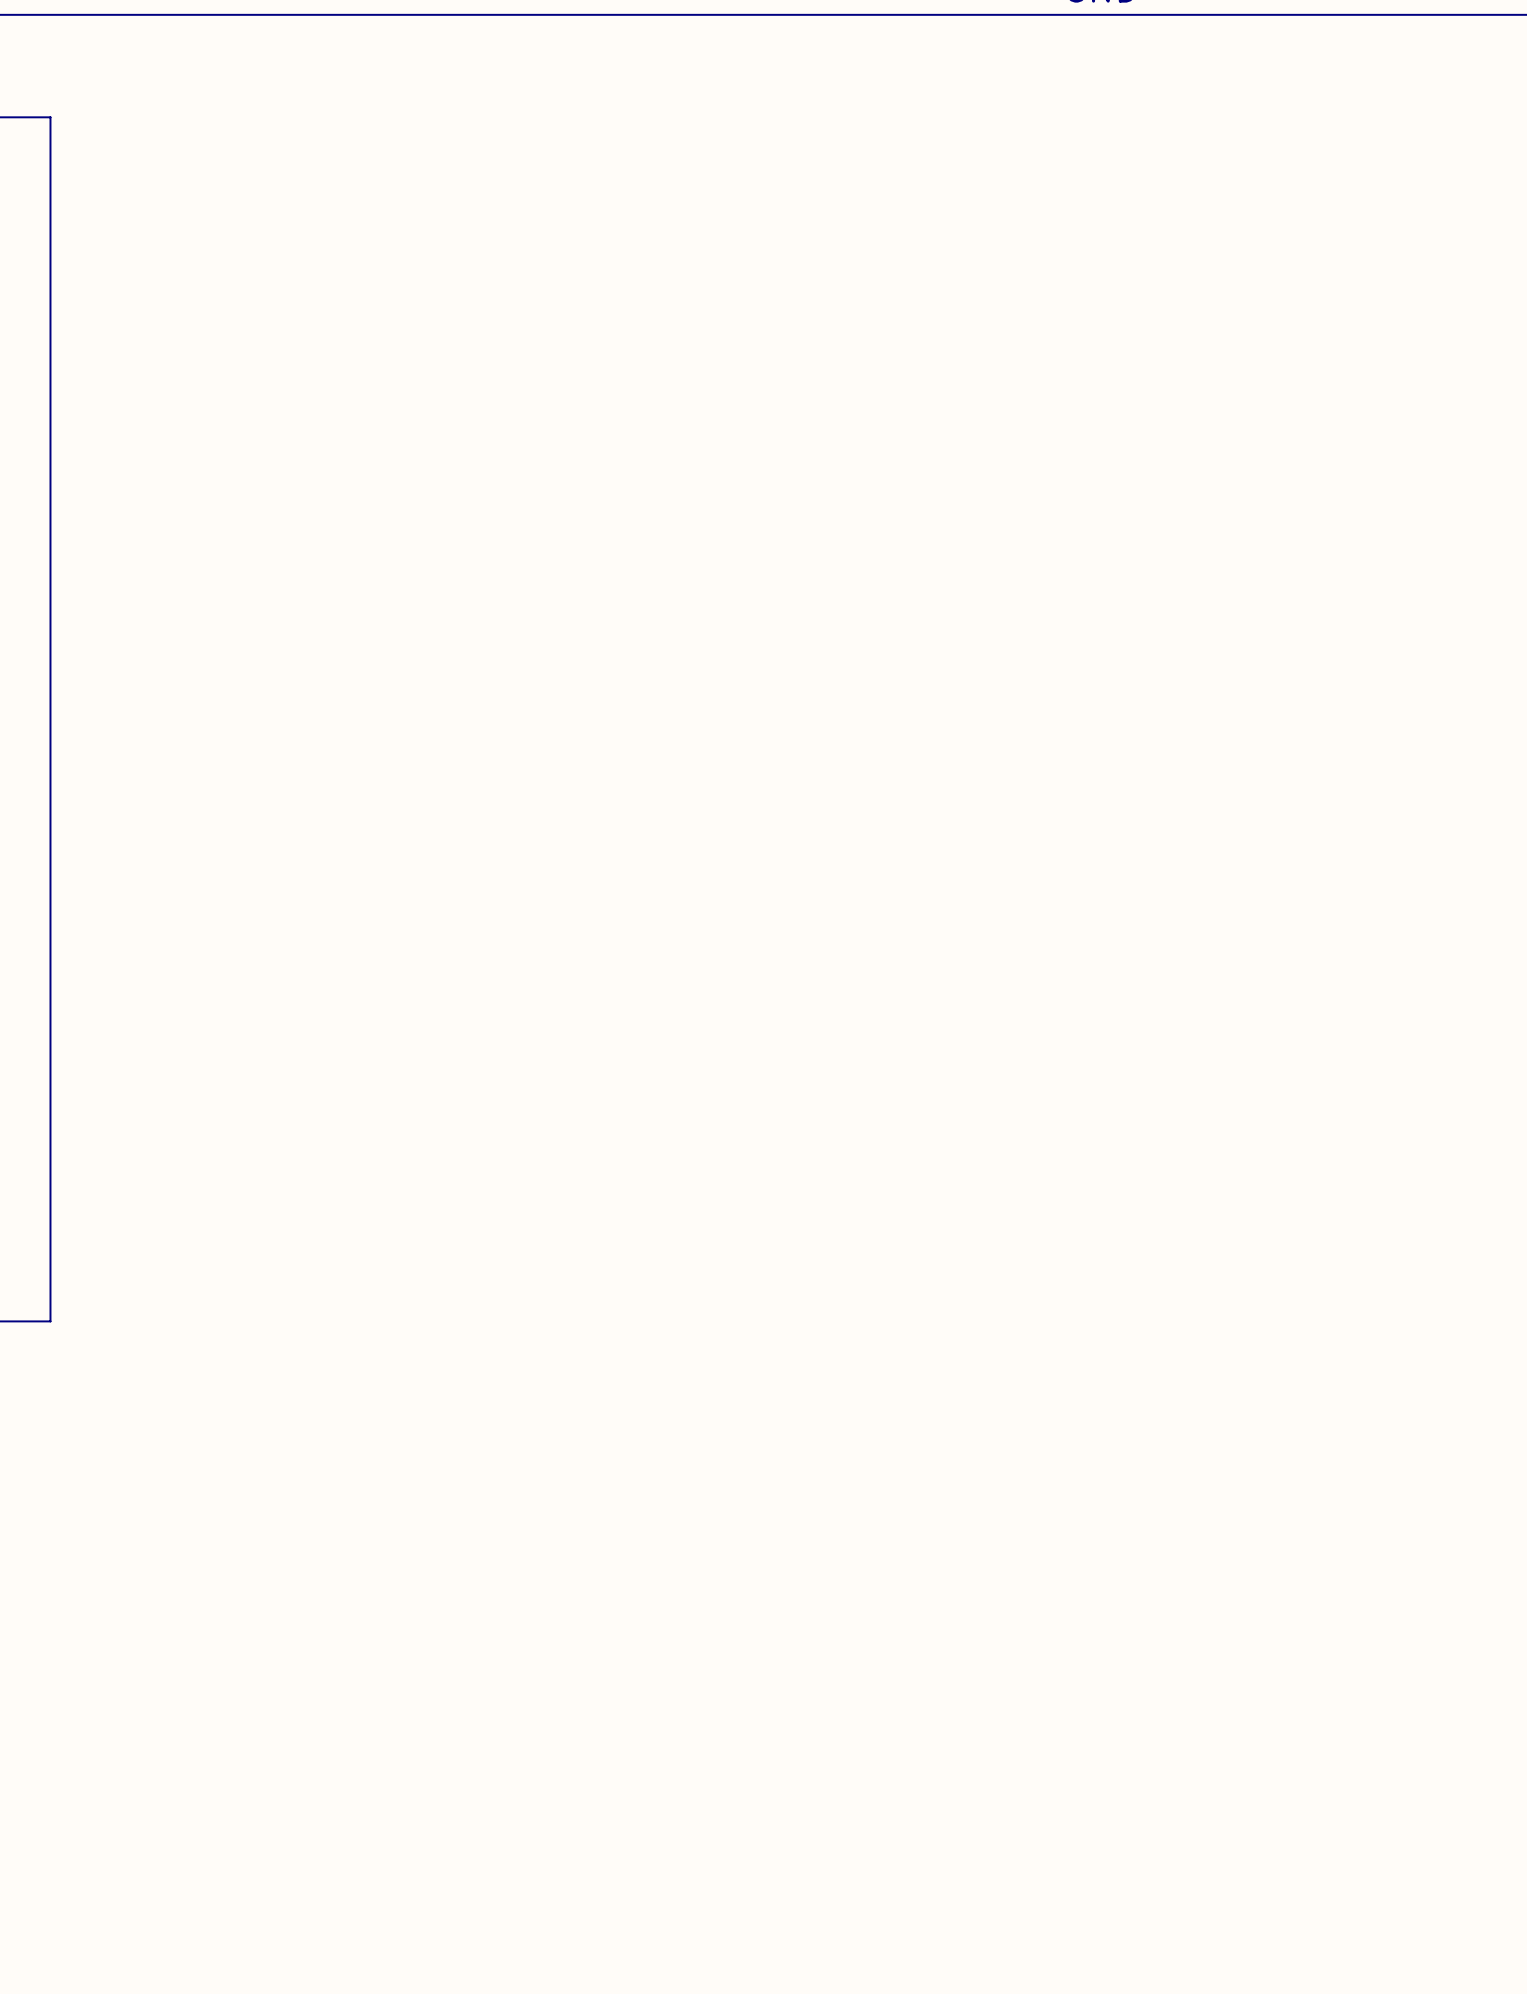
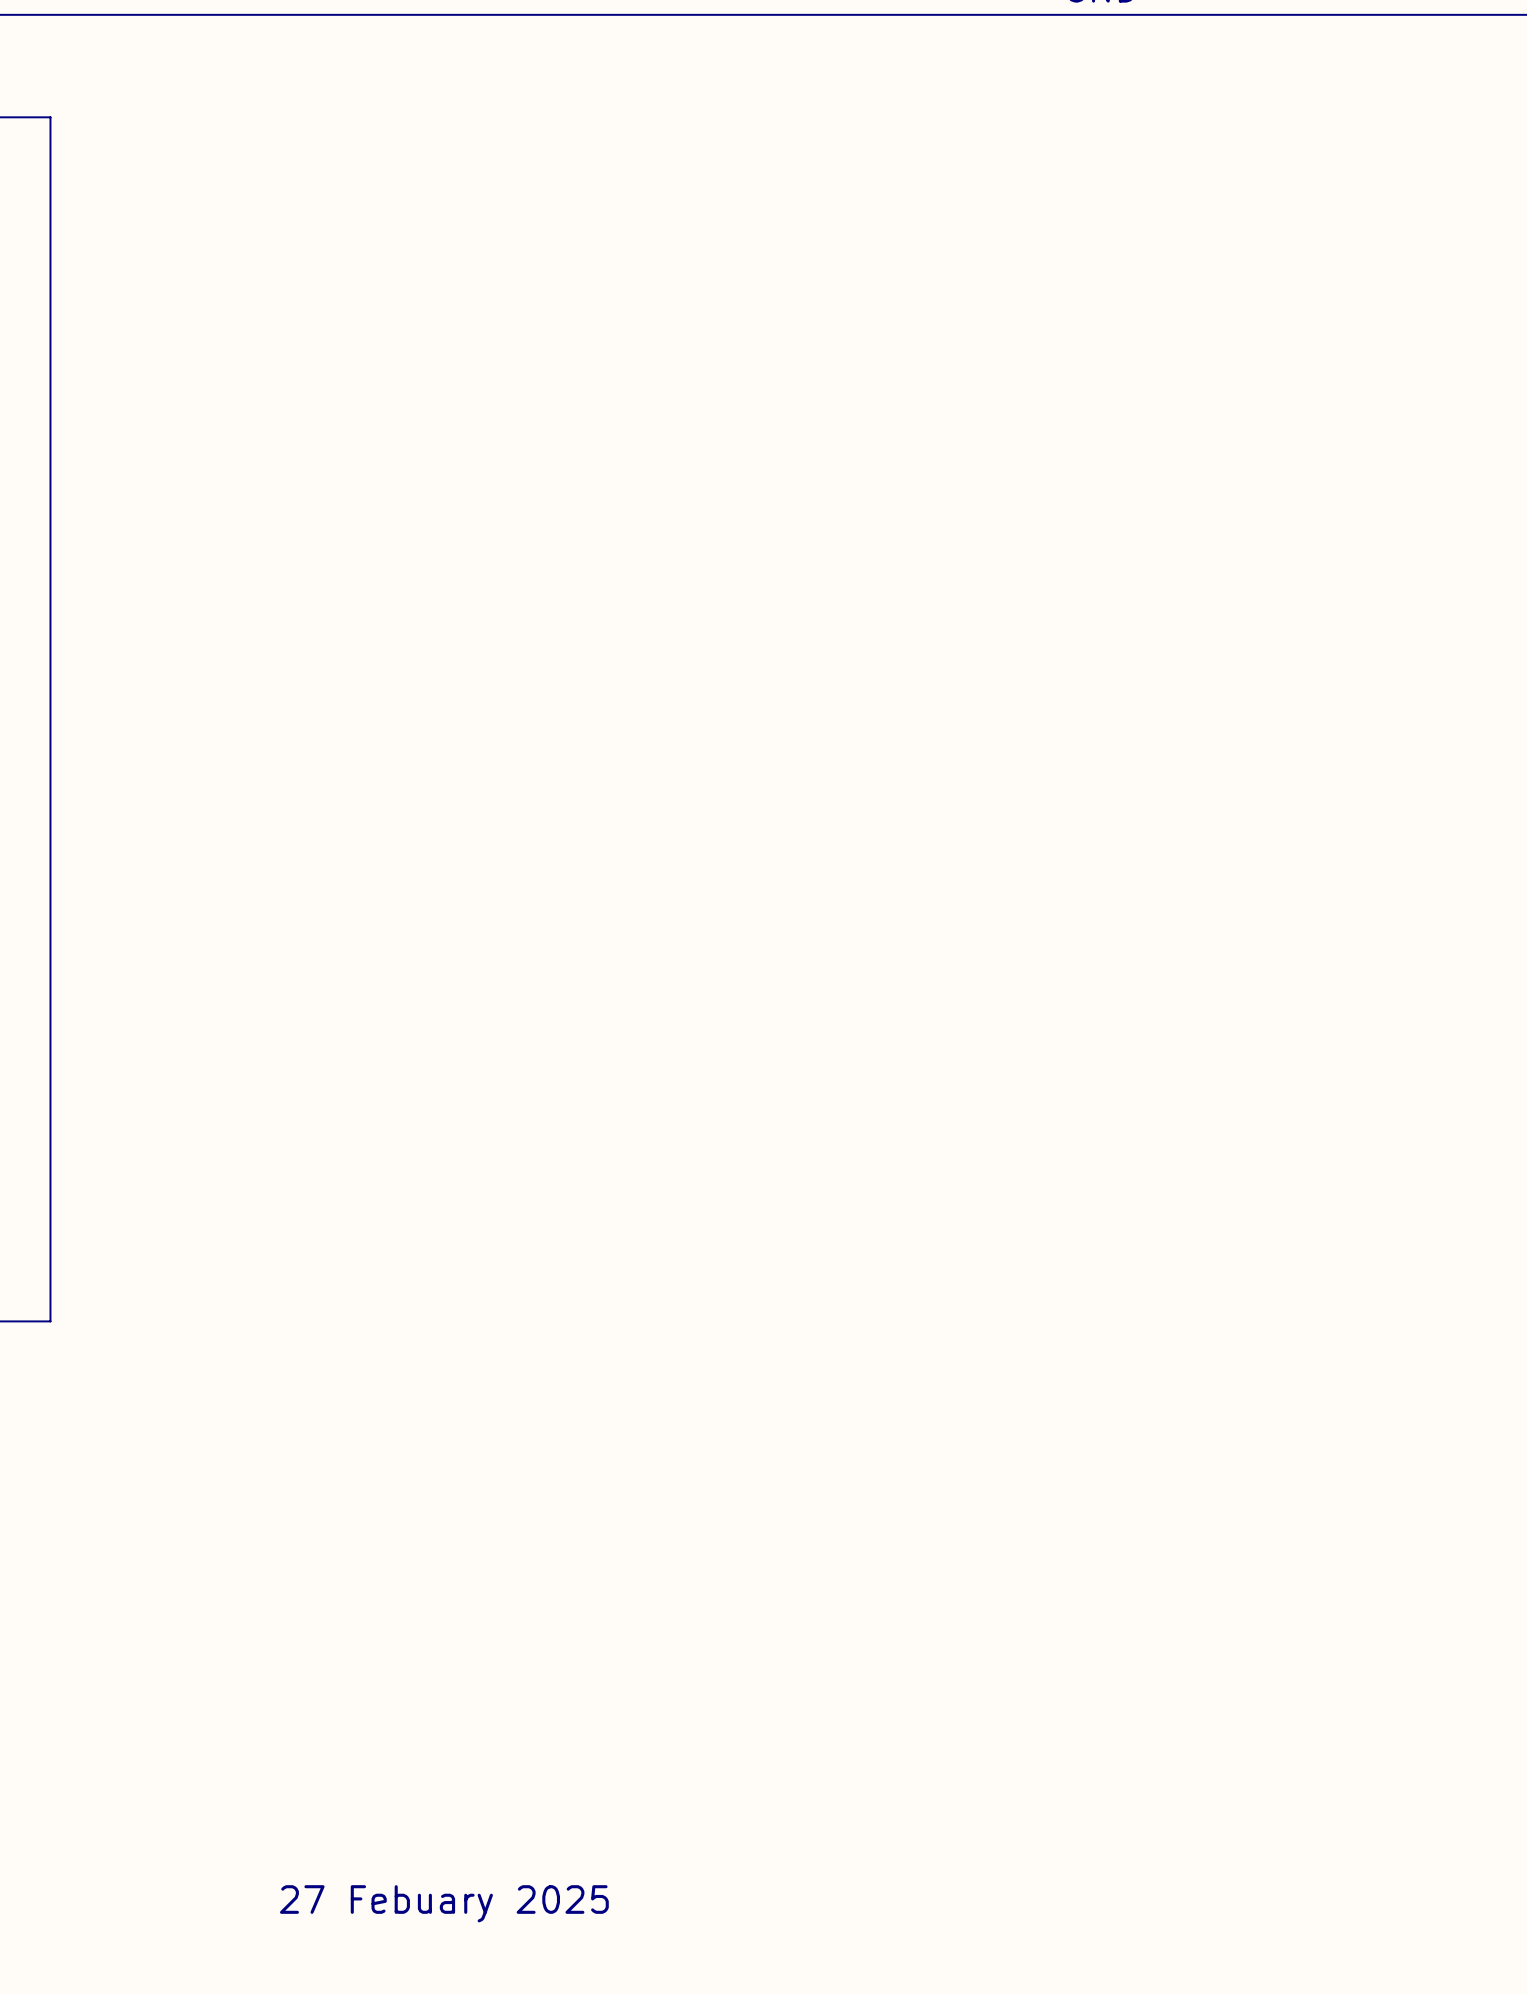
text: none -> 27 Febuary 2025 (444, 1903)

